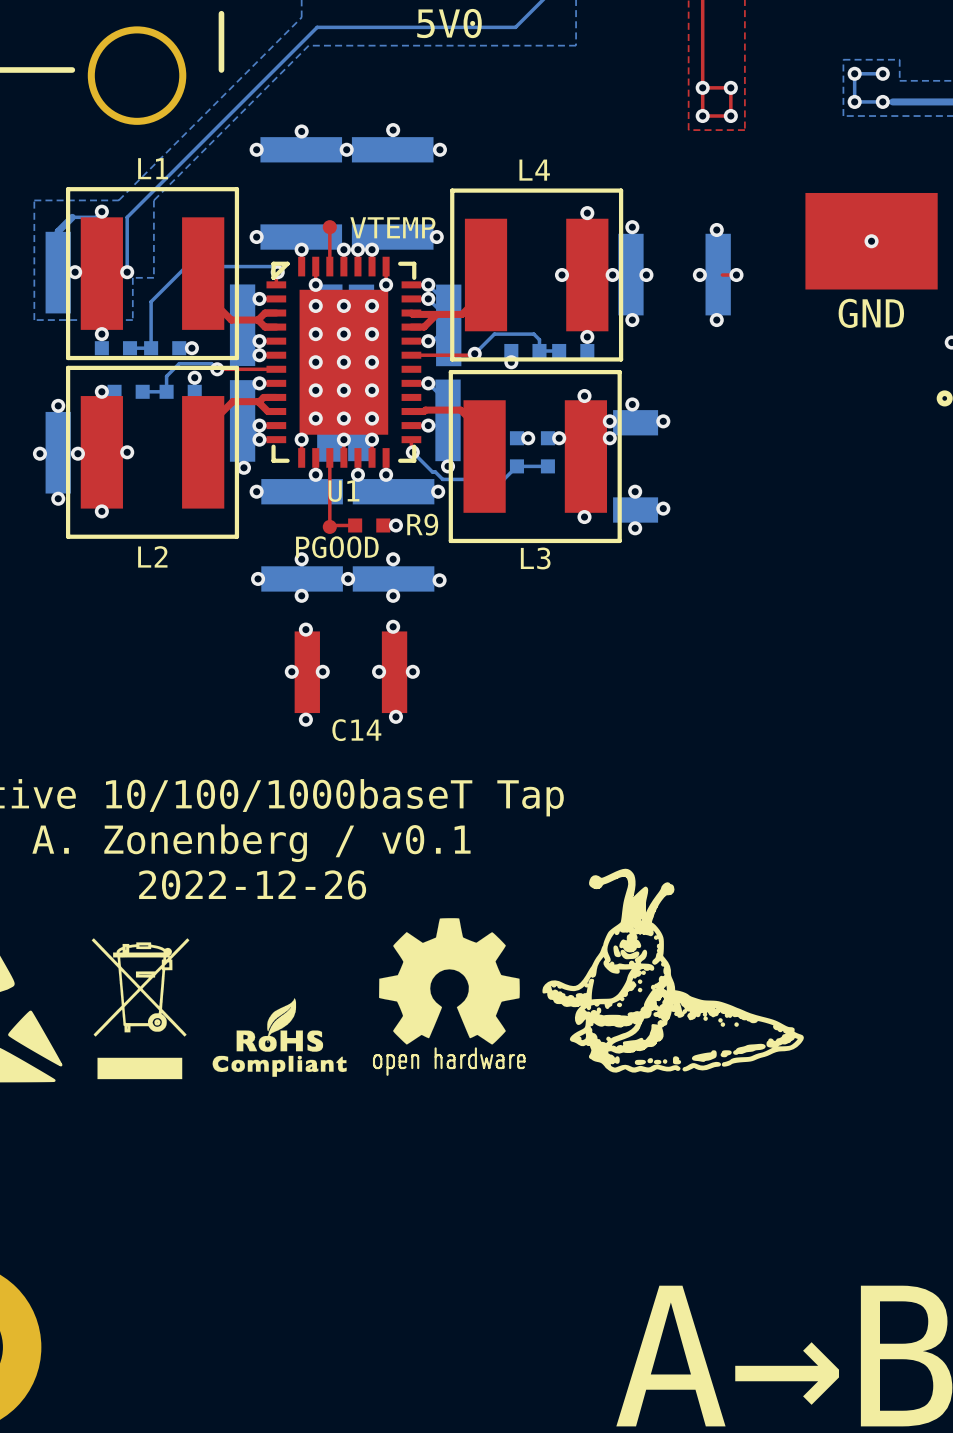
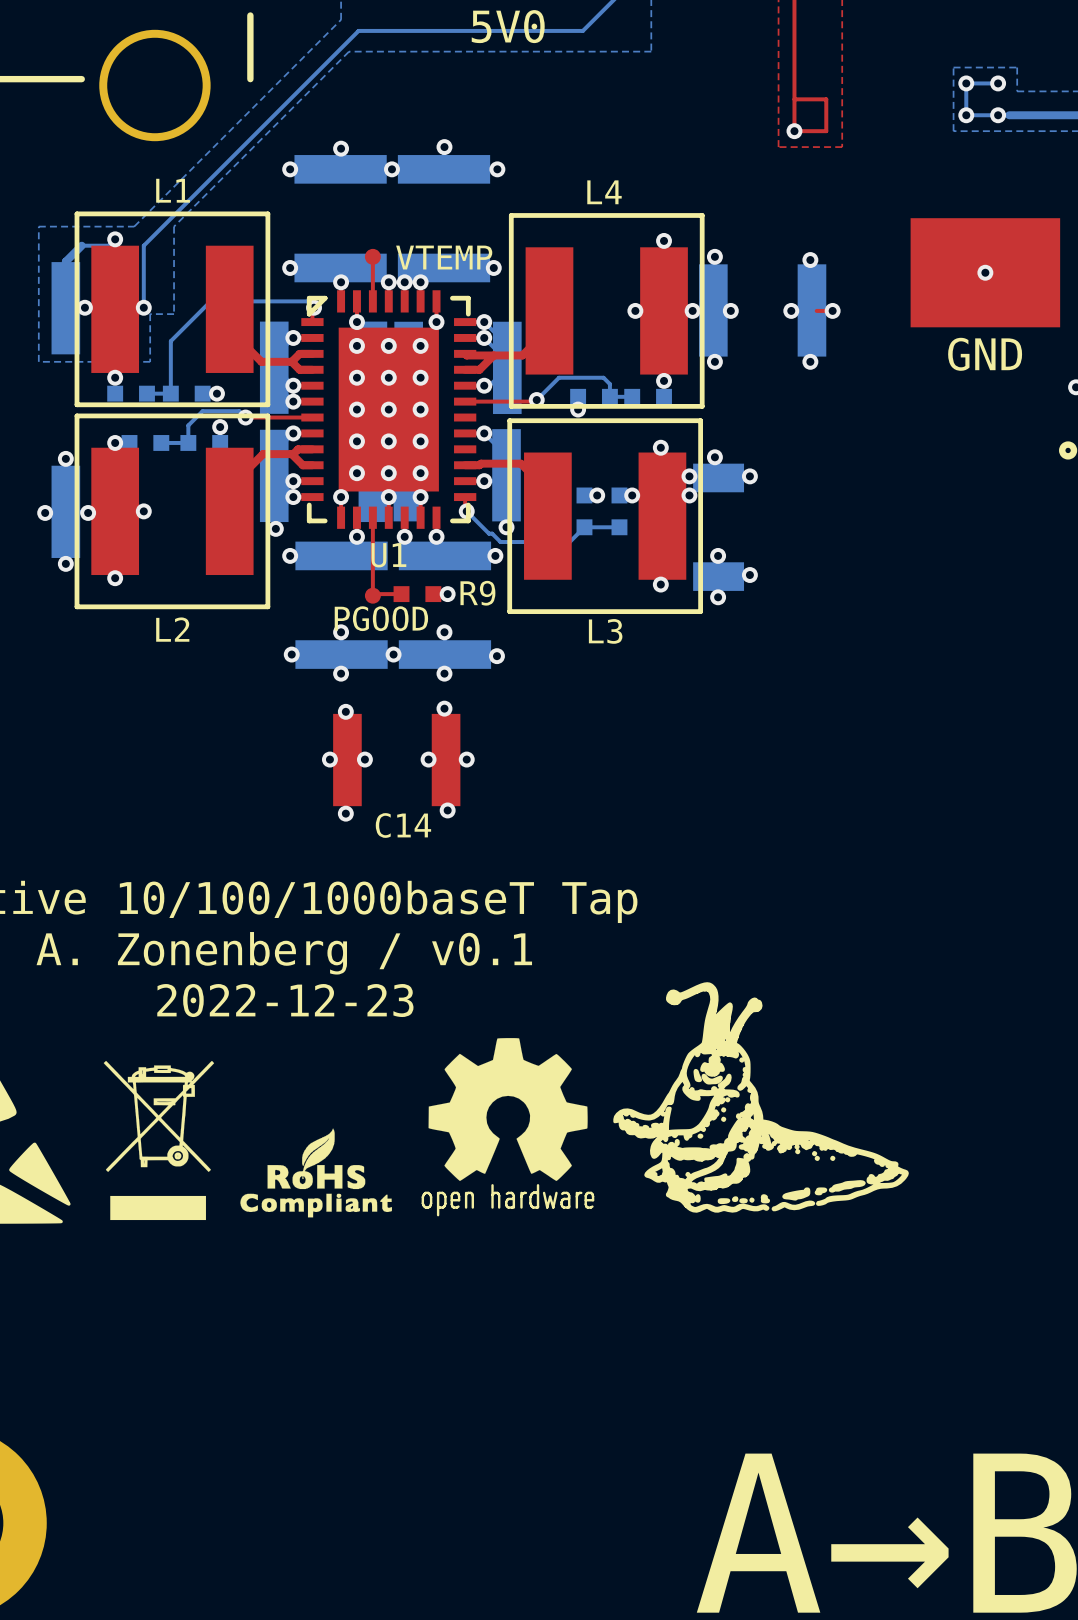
via: (702, 87) -> none
via: (730, 87) -> none
via: (730, 116) -> none
text: 2022-12-26 (252, 884) -> 2022-12-23 (285, 1000)

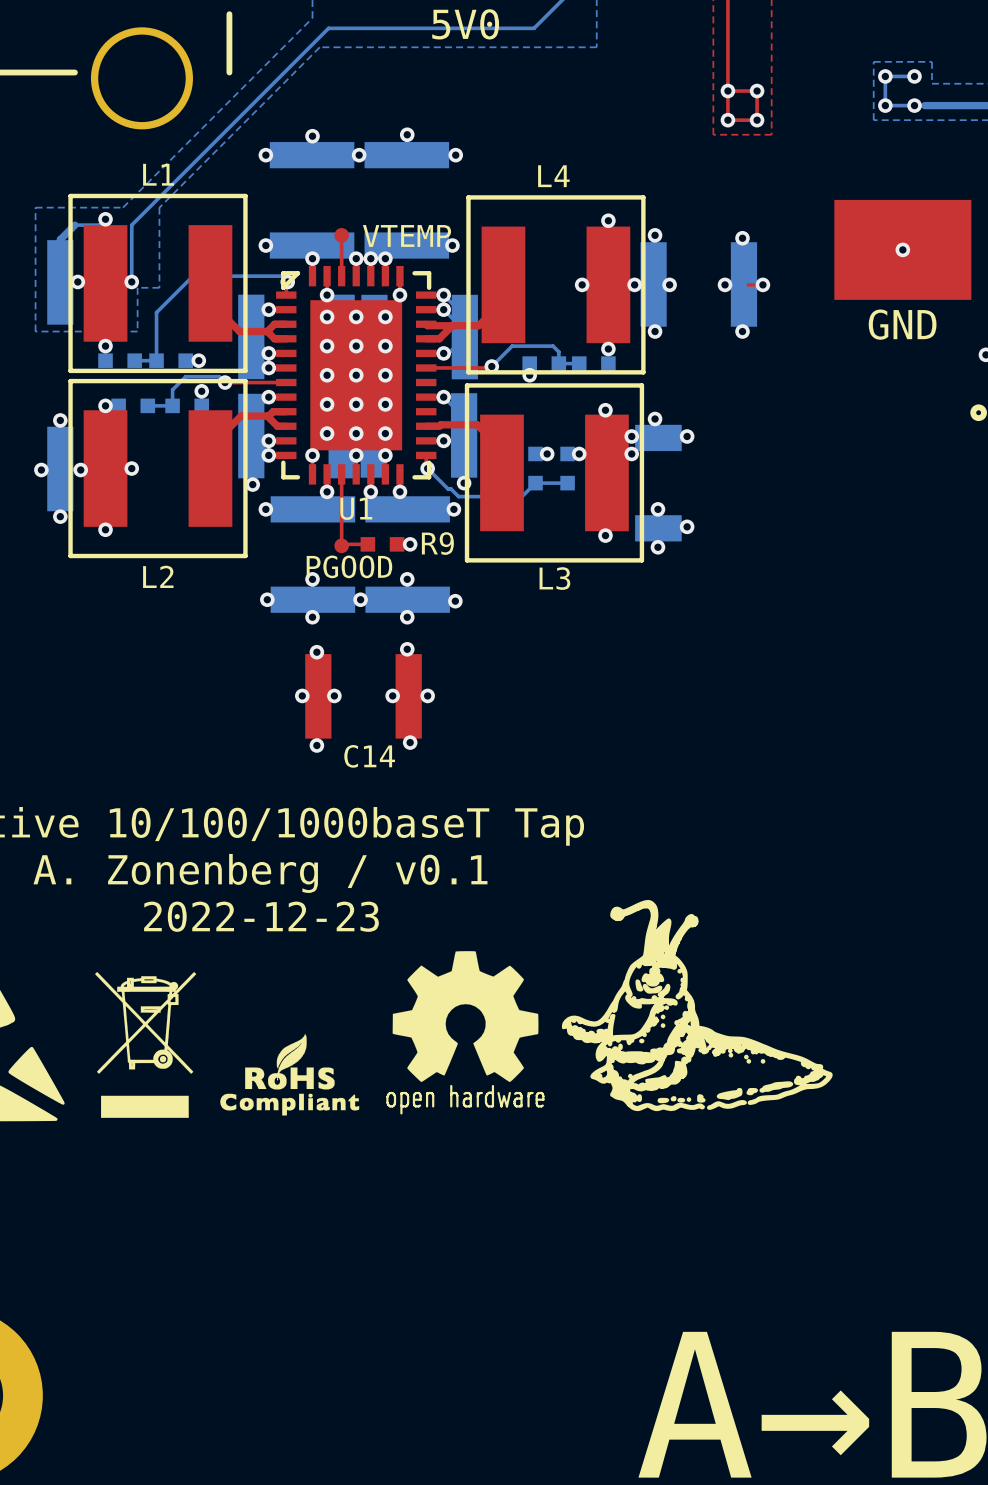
via: none -> (727, 91)
via: none -> (757, 91)
via: none -> (757, 120)

